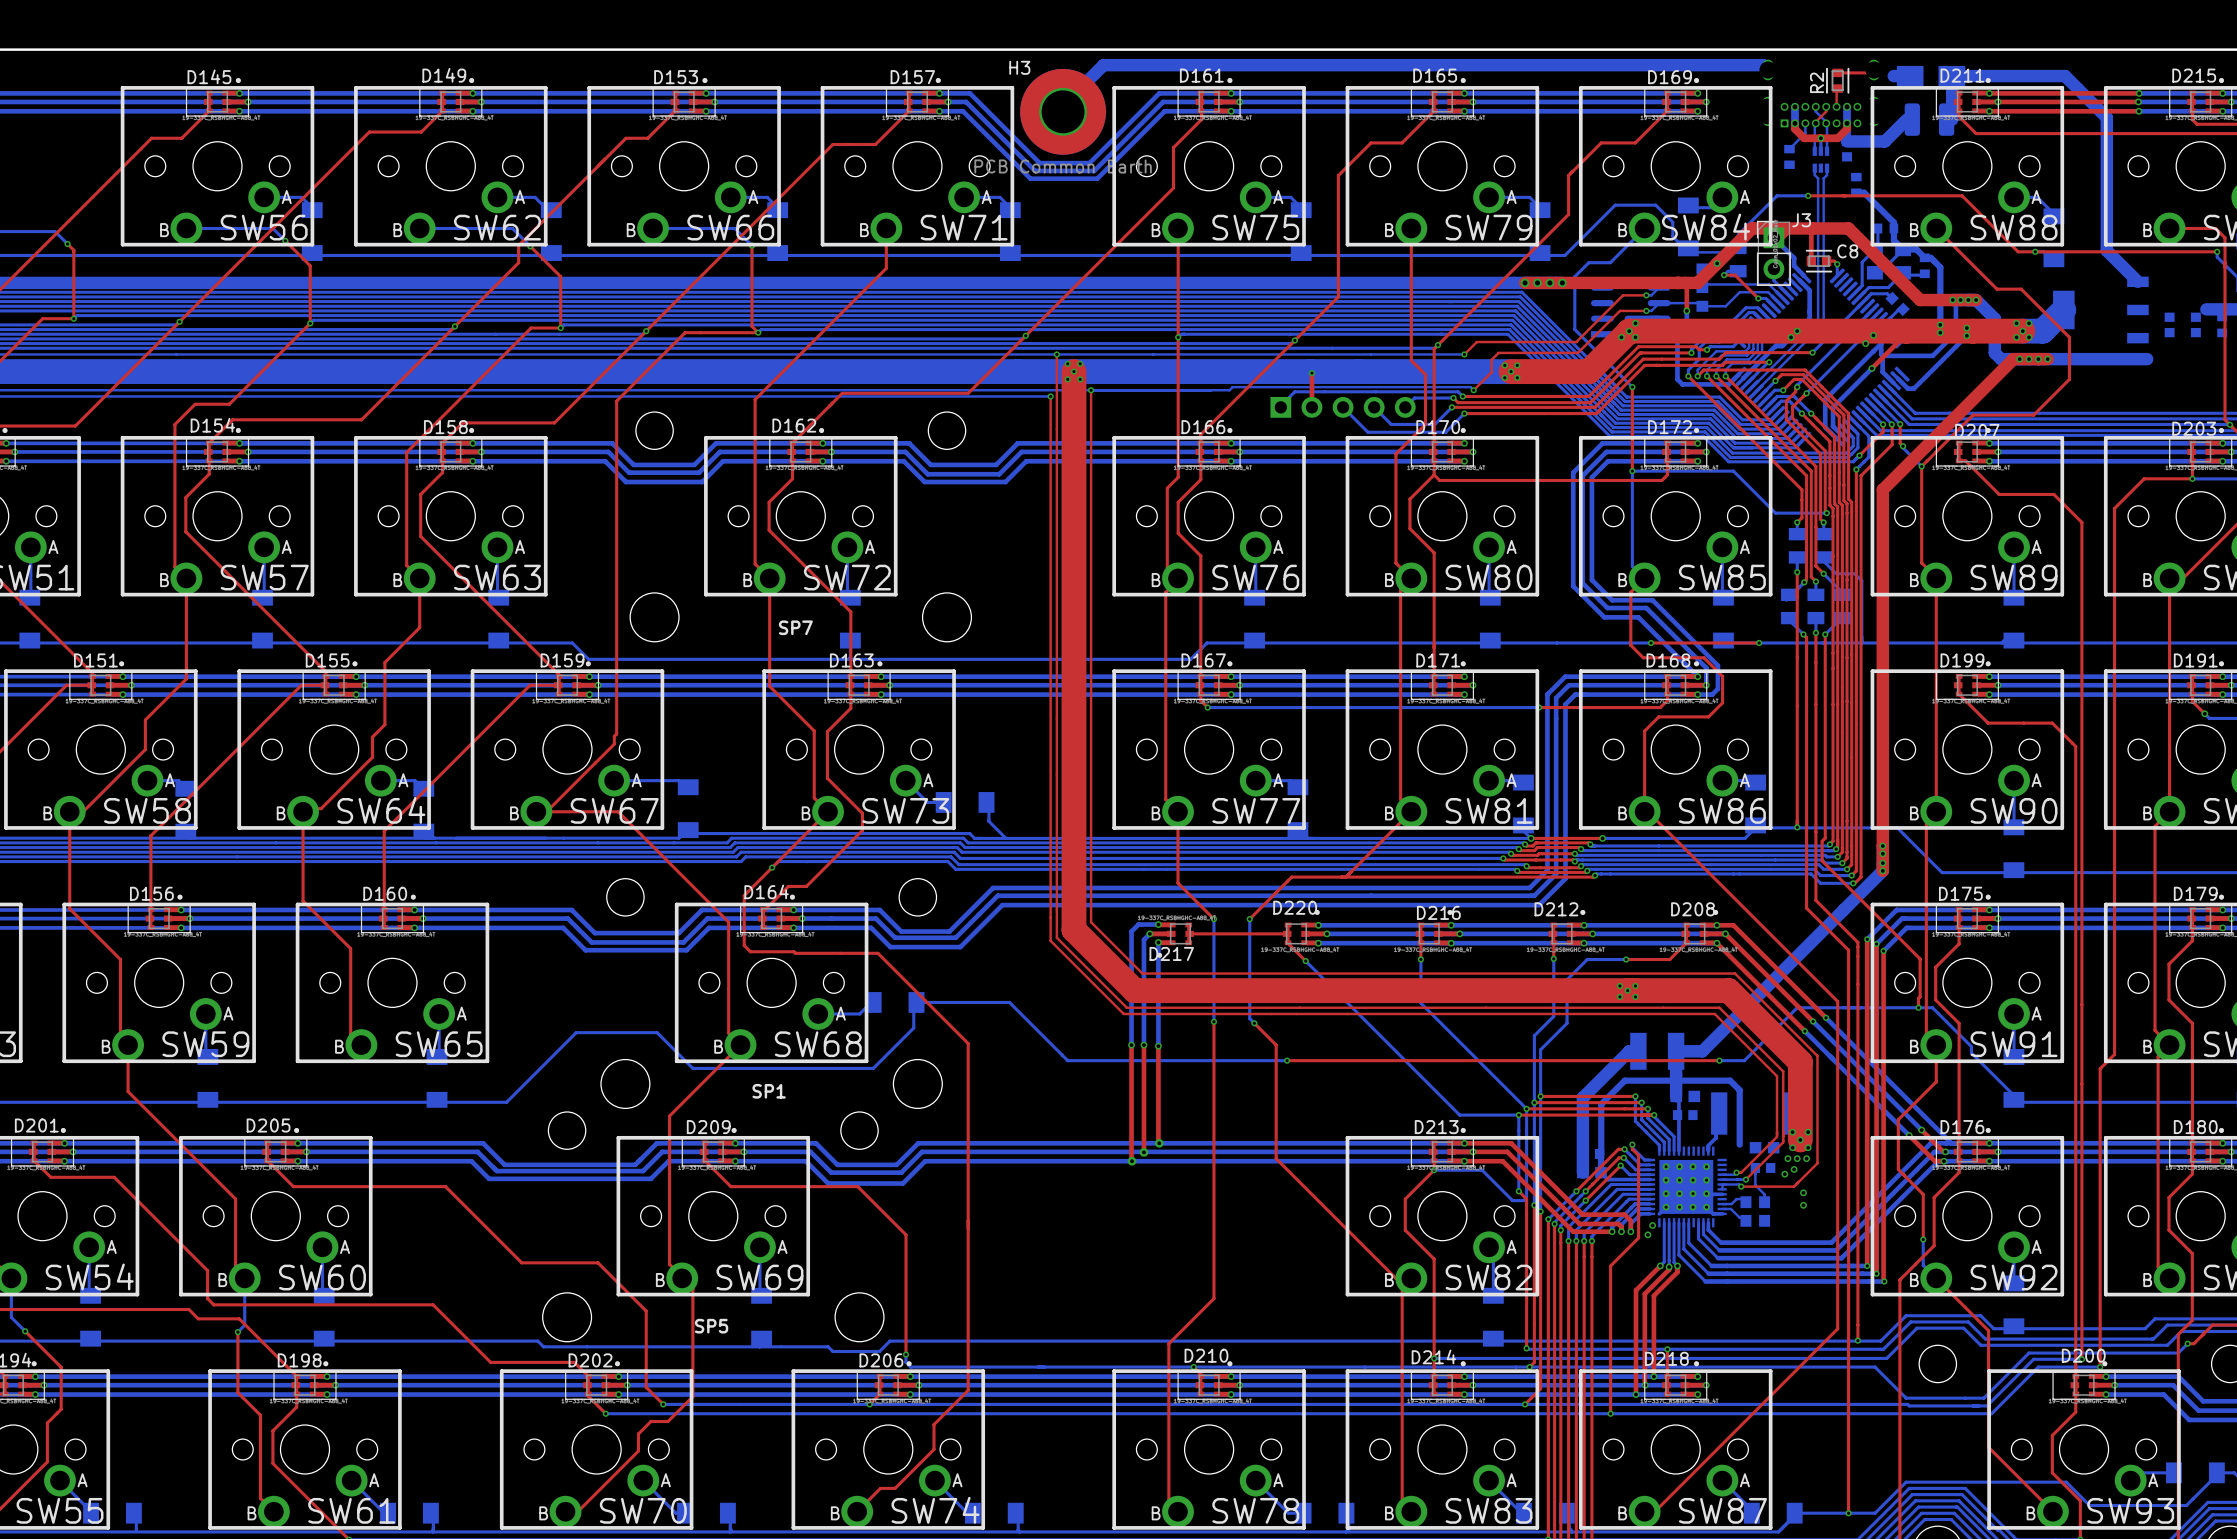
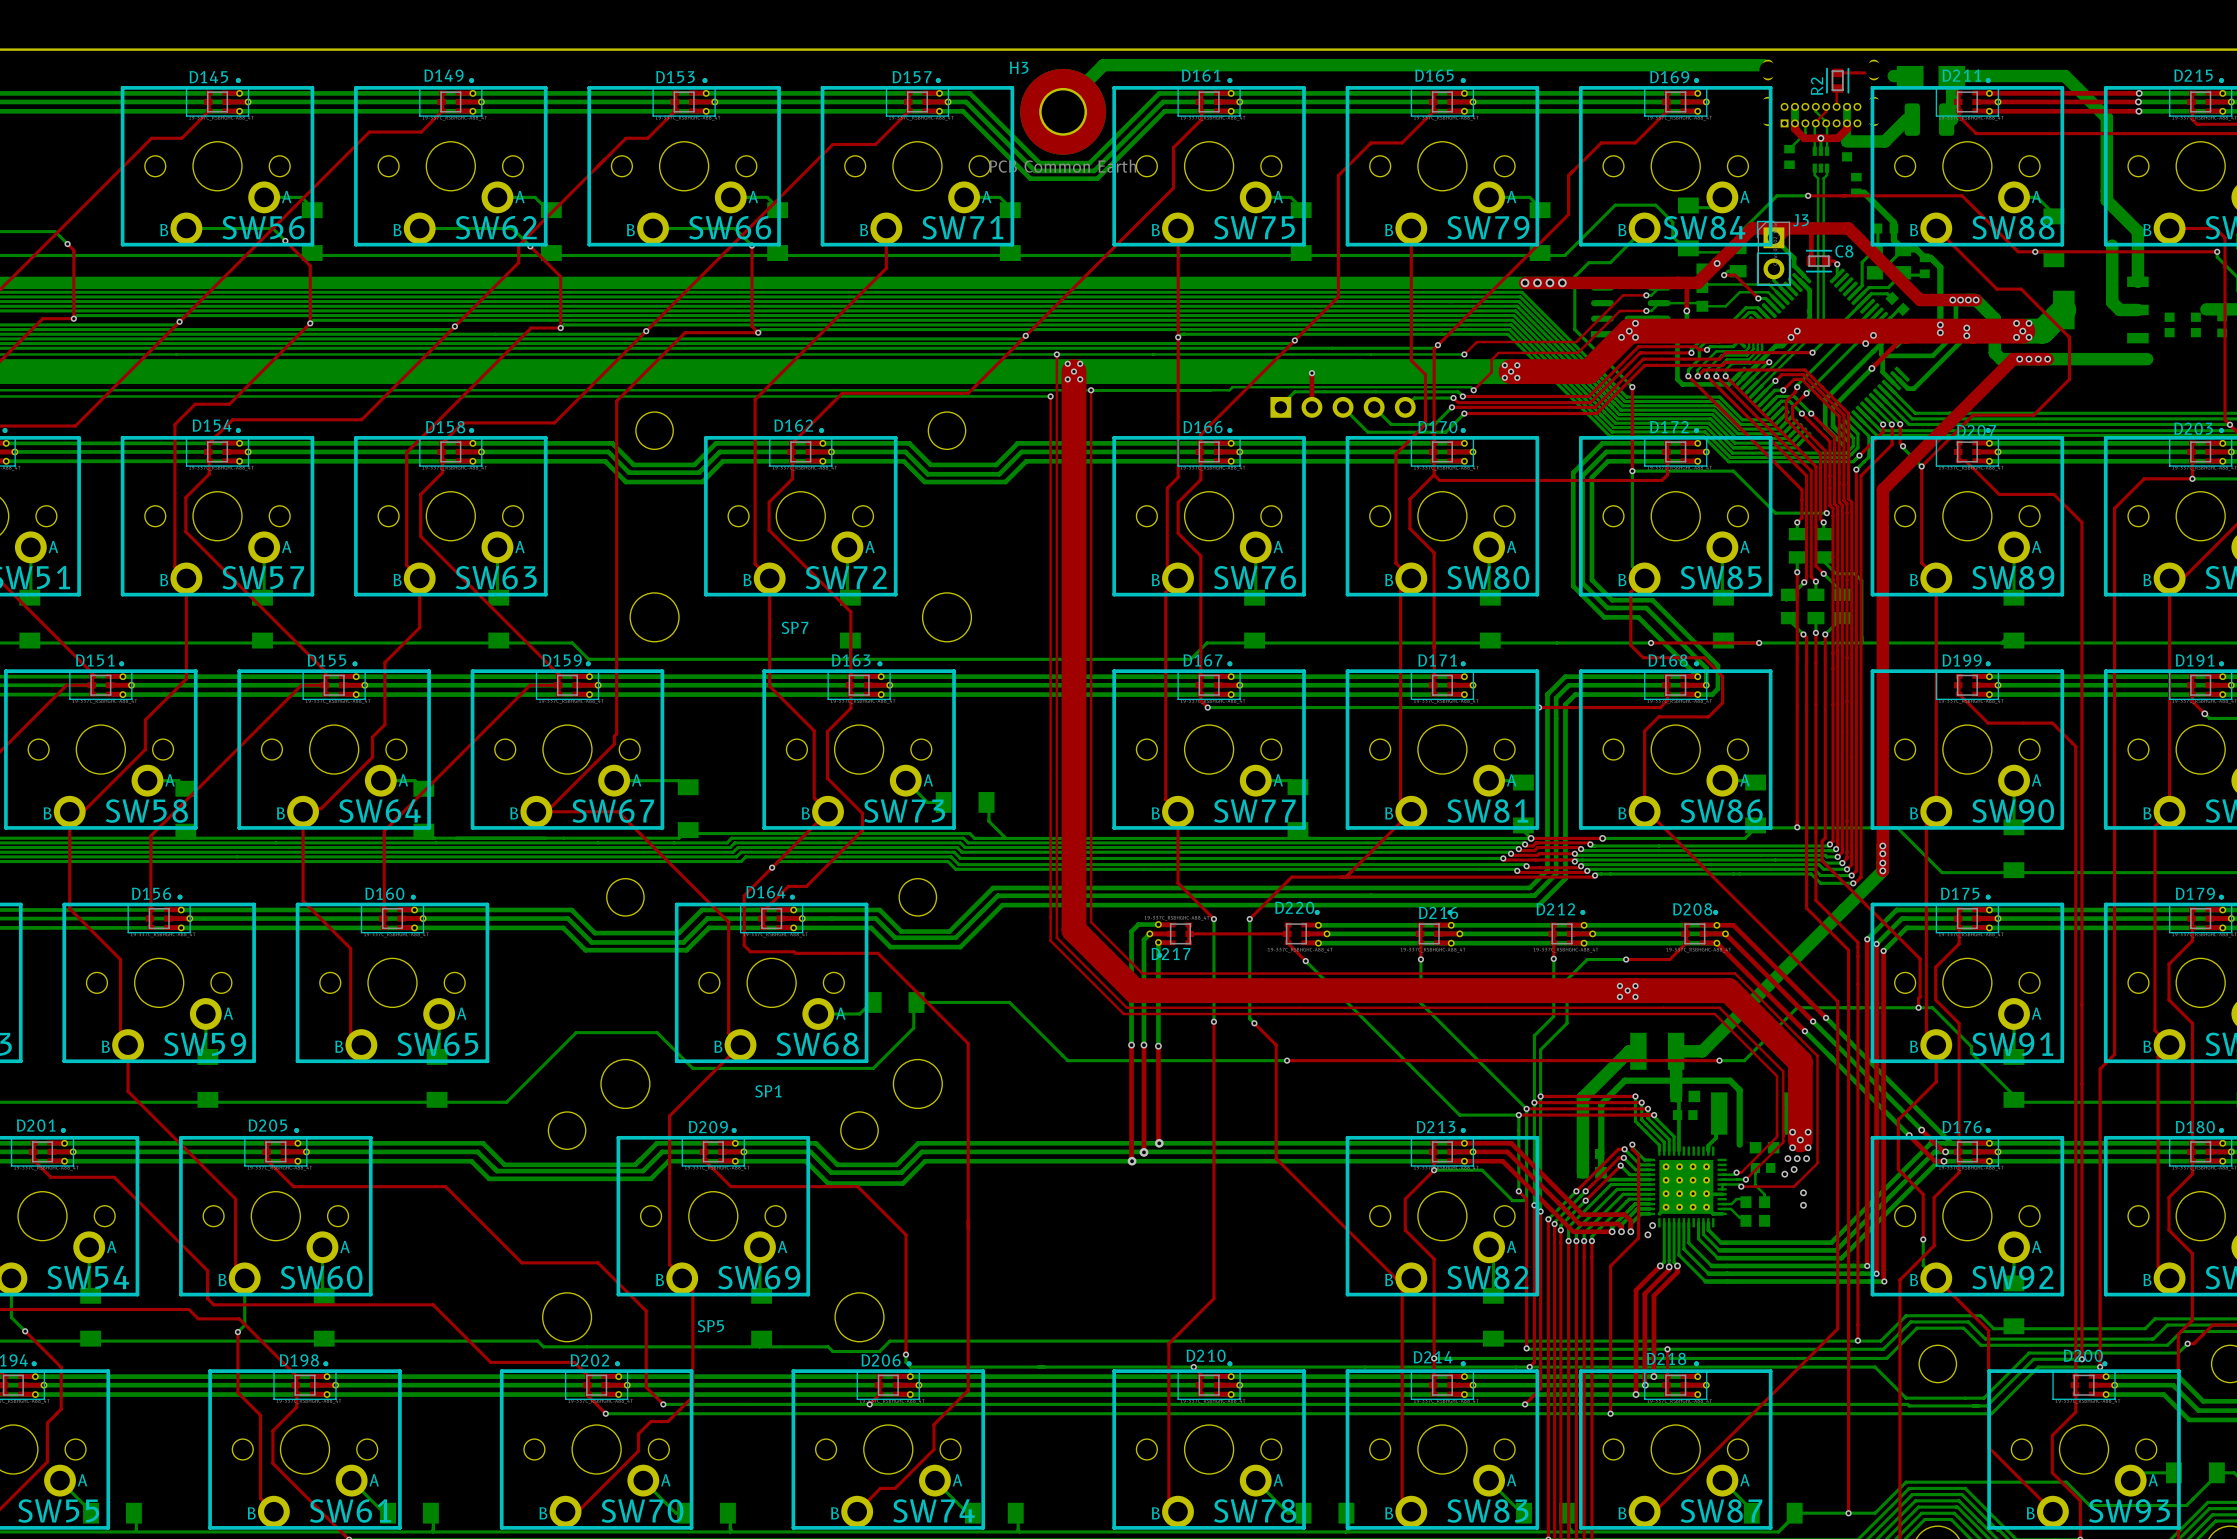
bottom track: (2106, 200) (2106, 250) (2137, 281) -> (2106, 200) (2137, 231) (2137, 281)
bottom track: none -> (2112, 245) (2112, 302) (2119, 309) (2137, 309)

